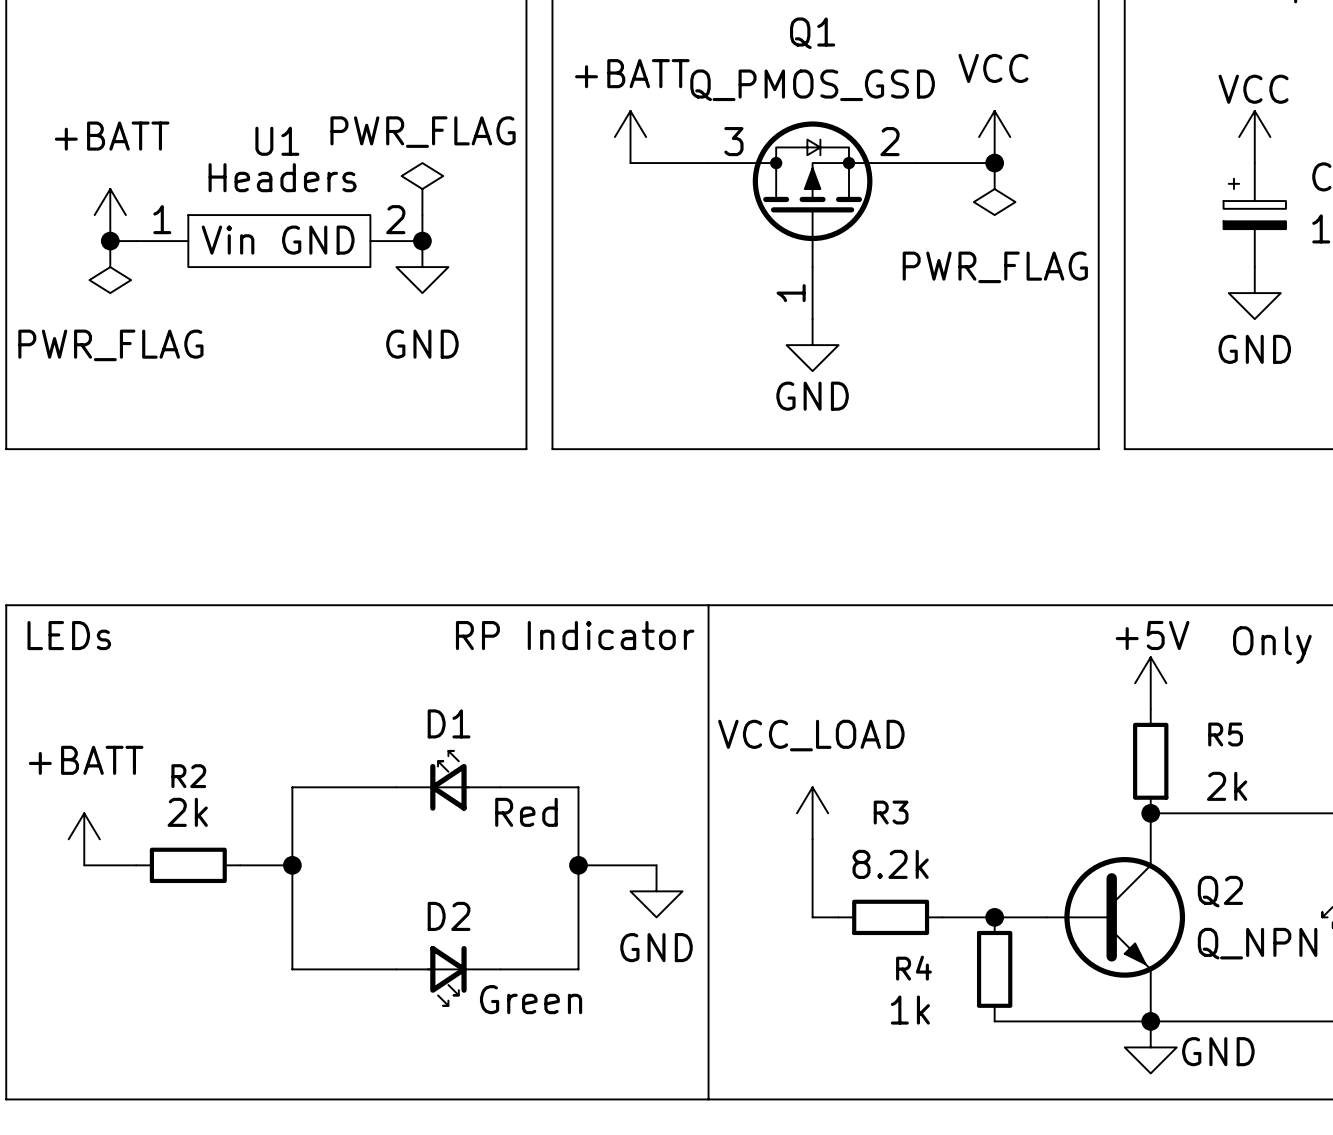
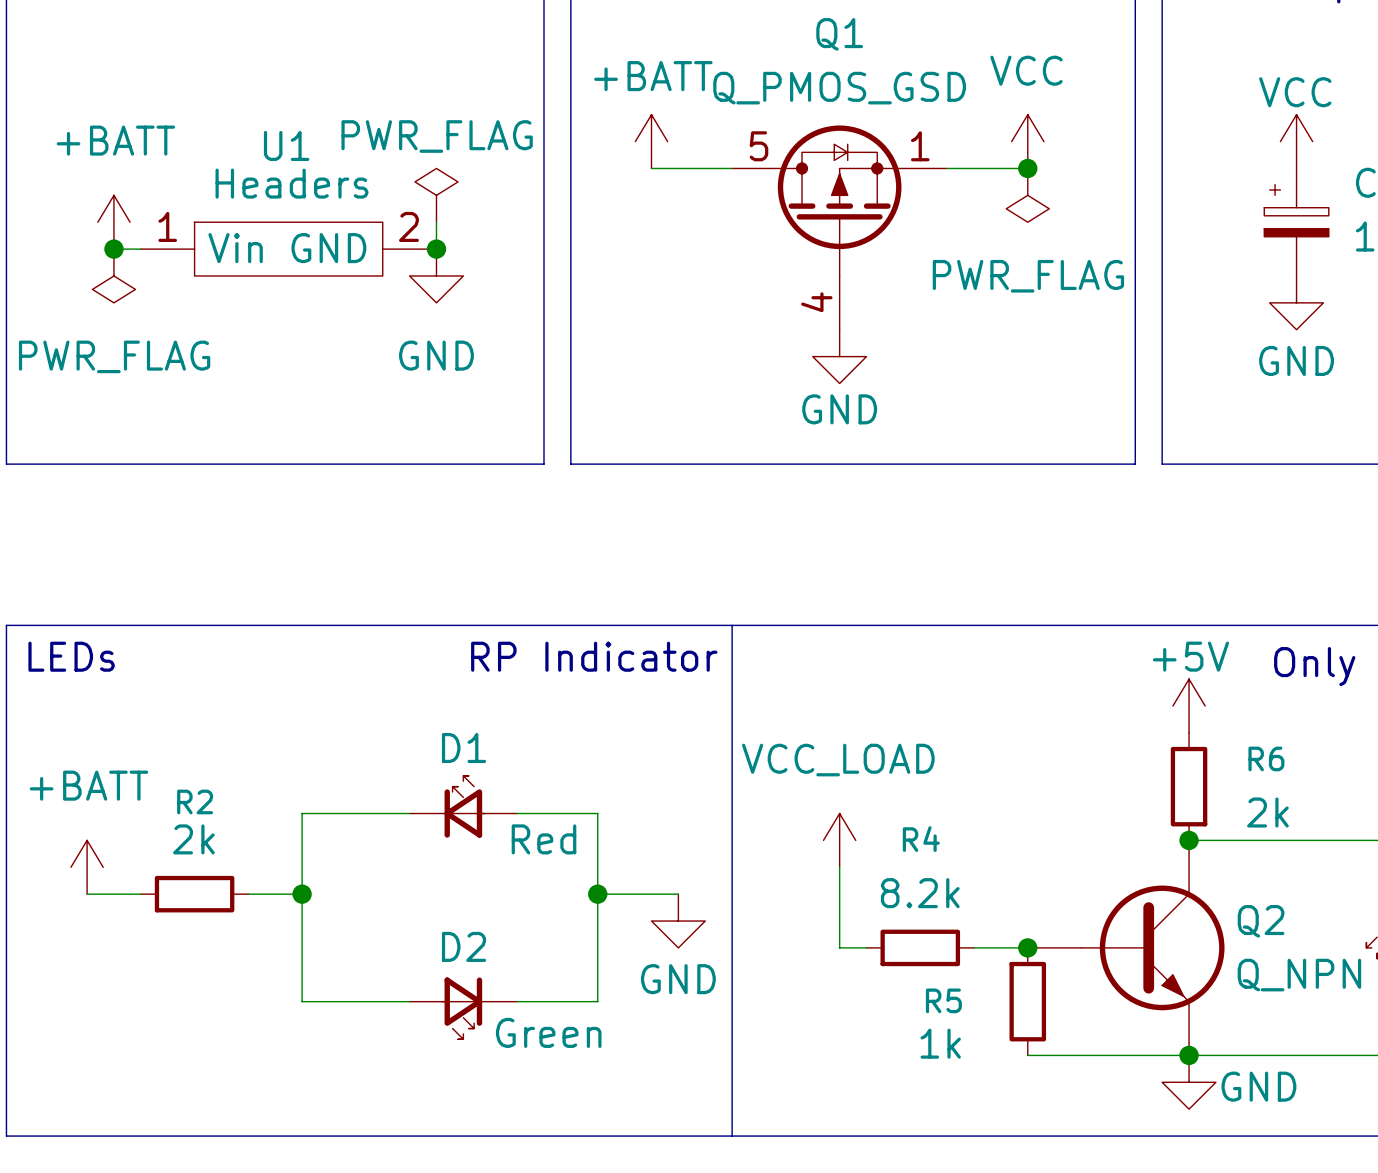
Q1 pin number: 3 (733, 141) -> 5 (759, 146)
Q1 pin number: 2 (890, 141) -> 1 (920, 146)
Q1 pin number: 1 (791, 293) -> 4 (816, 302)
R5 name: R5 (1225, 734) -> R6 (1266, 758)
R3 name: R3 (891, 812) -> R4 (921, 839)
R4 name: R4 (913, 968) -> R5 (943, 1000)

